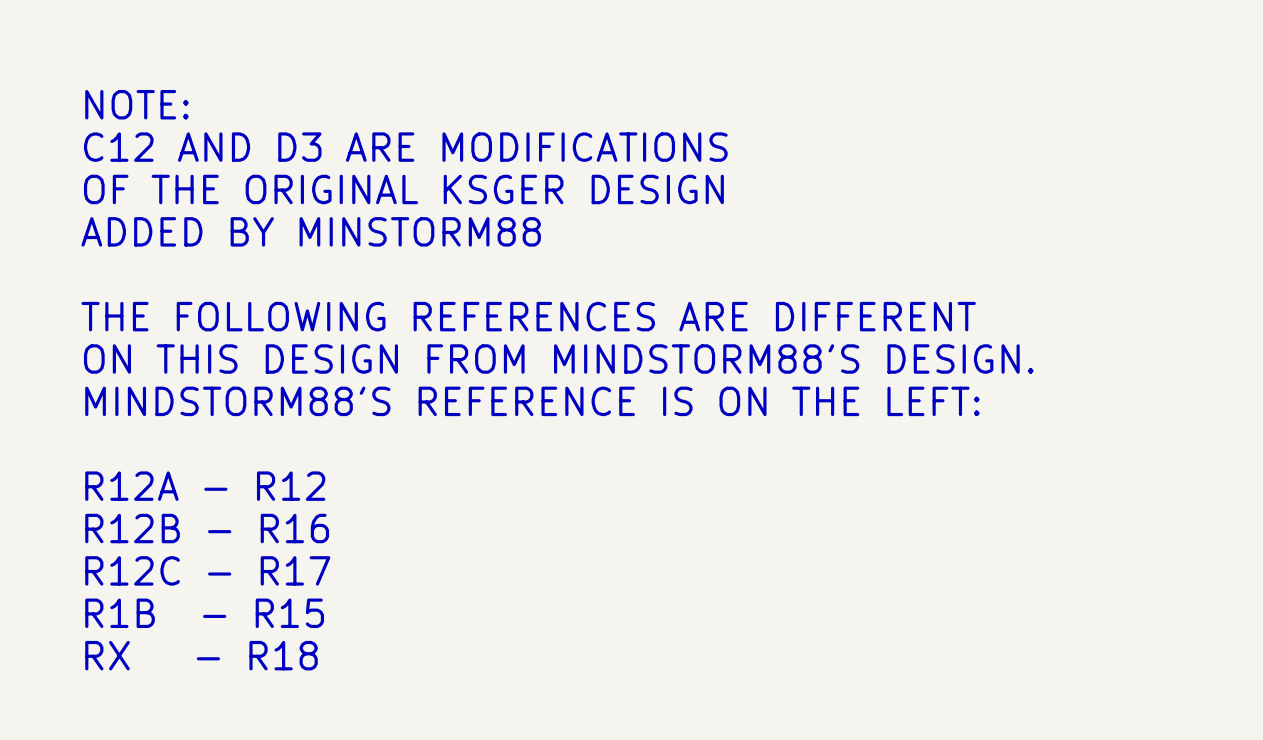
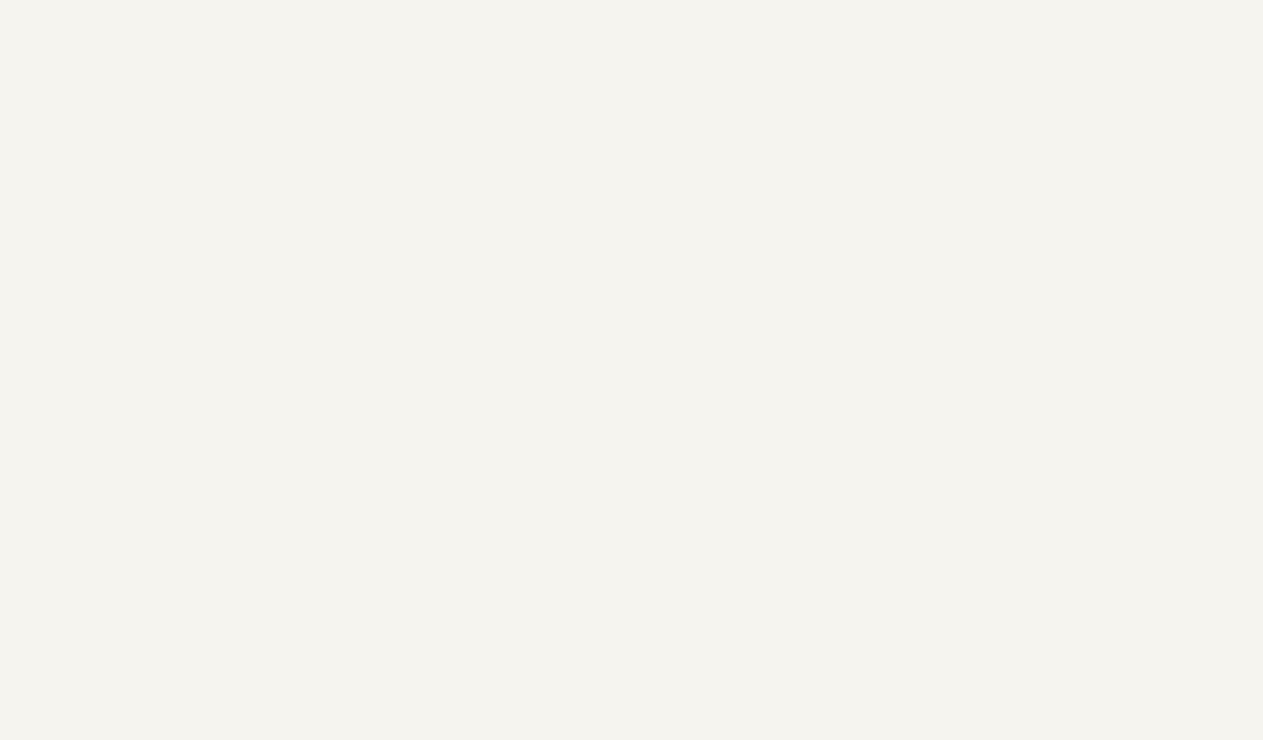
text: NOTE: (136, 104) -> none
text: C12 AND D3 ARE MODIFICATIONS (405, 147) -> none
text: OF THE ORIGINAL KSGER DESIGN (403, 189) -> none
text: ADDED BY MINSTORM88 (311, 231) -> none
text: THE FOLLOWING REFERENCES ARE DIFFERENT (528, 316) -> none
text: ON THIS DESIGN FROM MINDSTORM88'S DESIGN. (558, 359) -> none
text: MINDSTORM88'S REFERENCE IS ON THE LEFT: (532, 401) -> none
text: R12A - R12 (205, 486) -> none
text: R12B - R16 (207, 528) -> none
text: R12C - R17 (207, 570) -> none
text: R1B - R15 (204, 613) -> none
text: RX - R18 (201, 655) -> none

